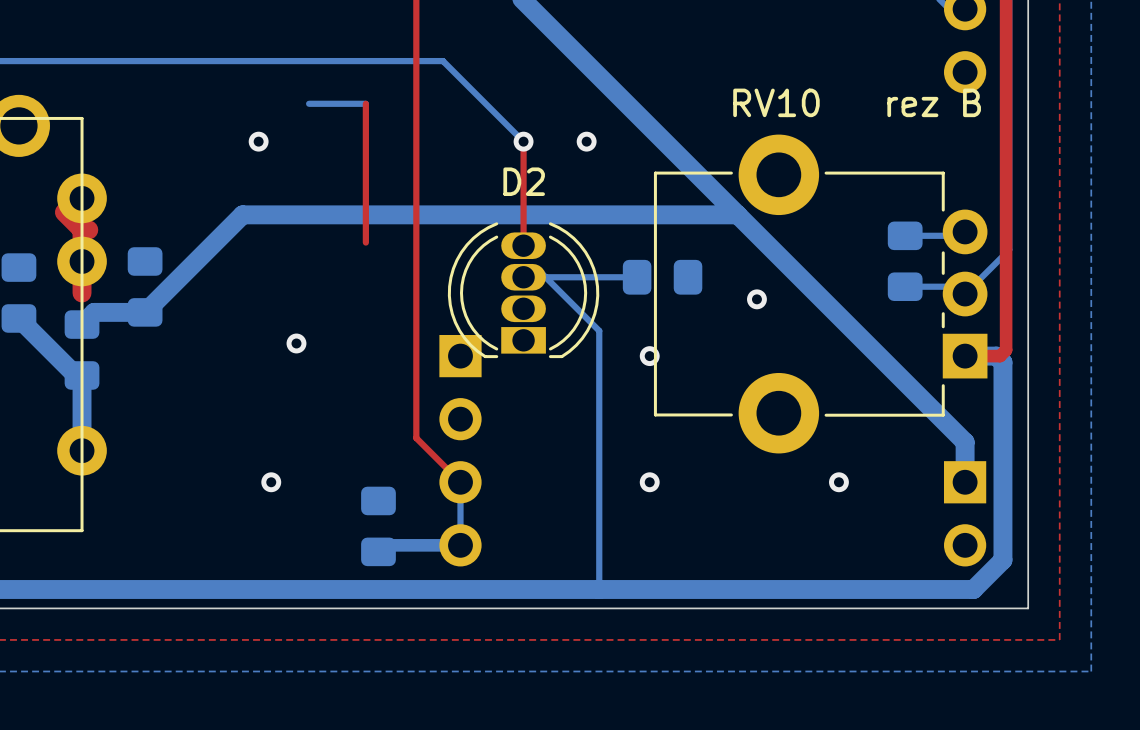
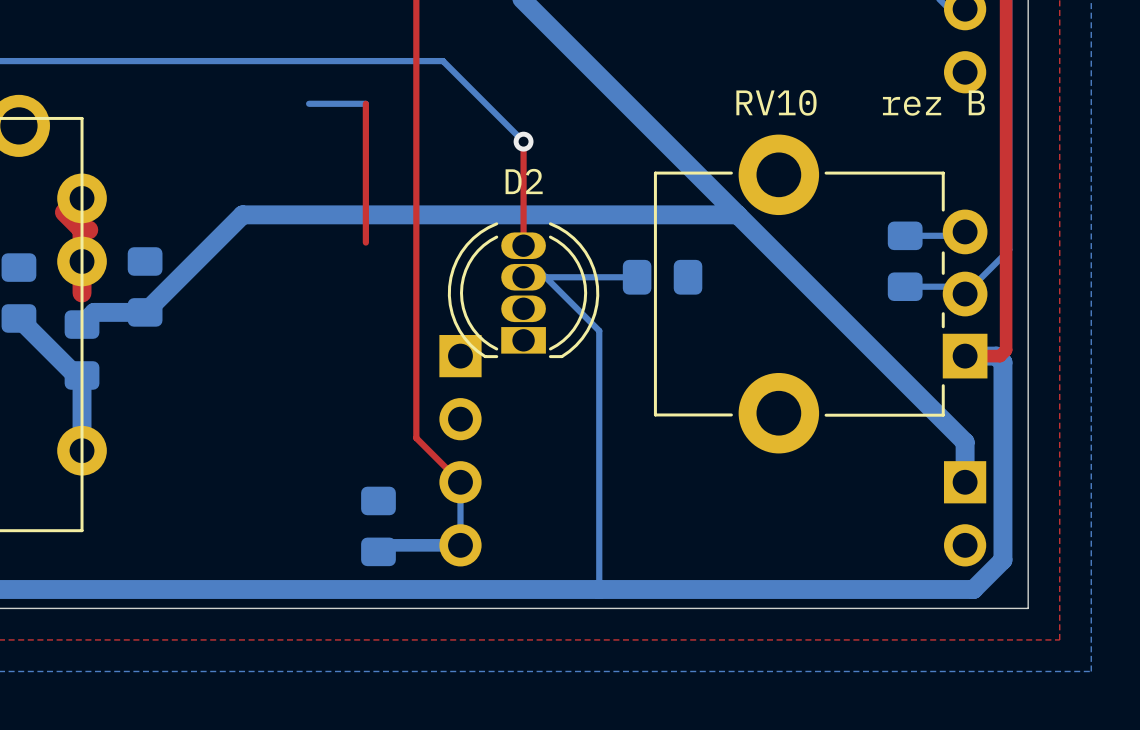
via: (258, 141) -> none
via: (586, 141) -> none
via: (756, 299) -> none
via: (296, 343) -> none
via: (649, 356) -> none
via: (271, 482) -> none
via: (649, 482) -> none
via: (838, 482) -> none

